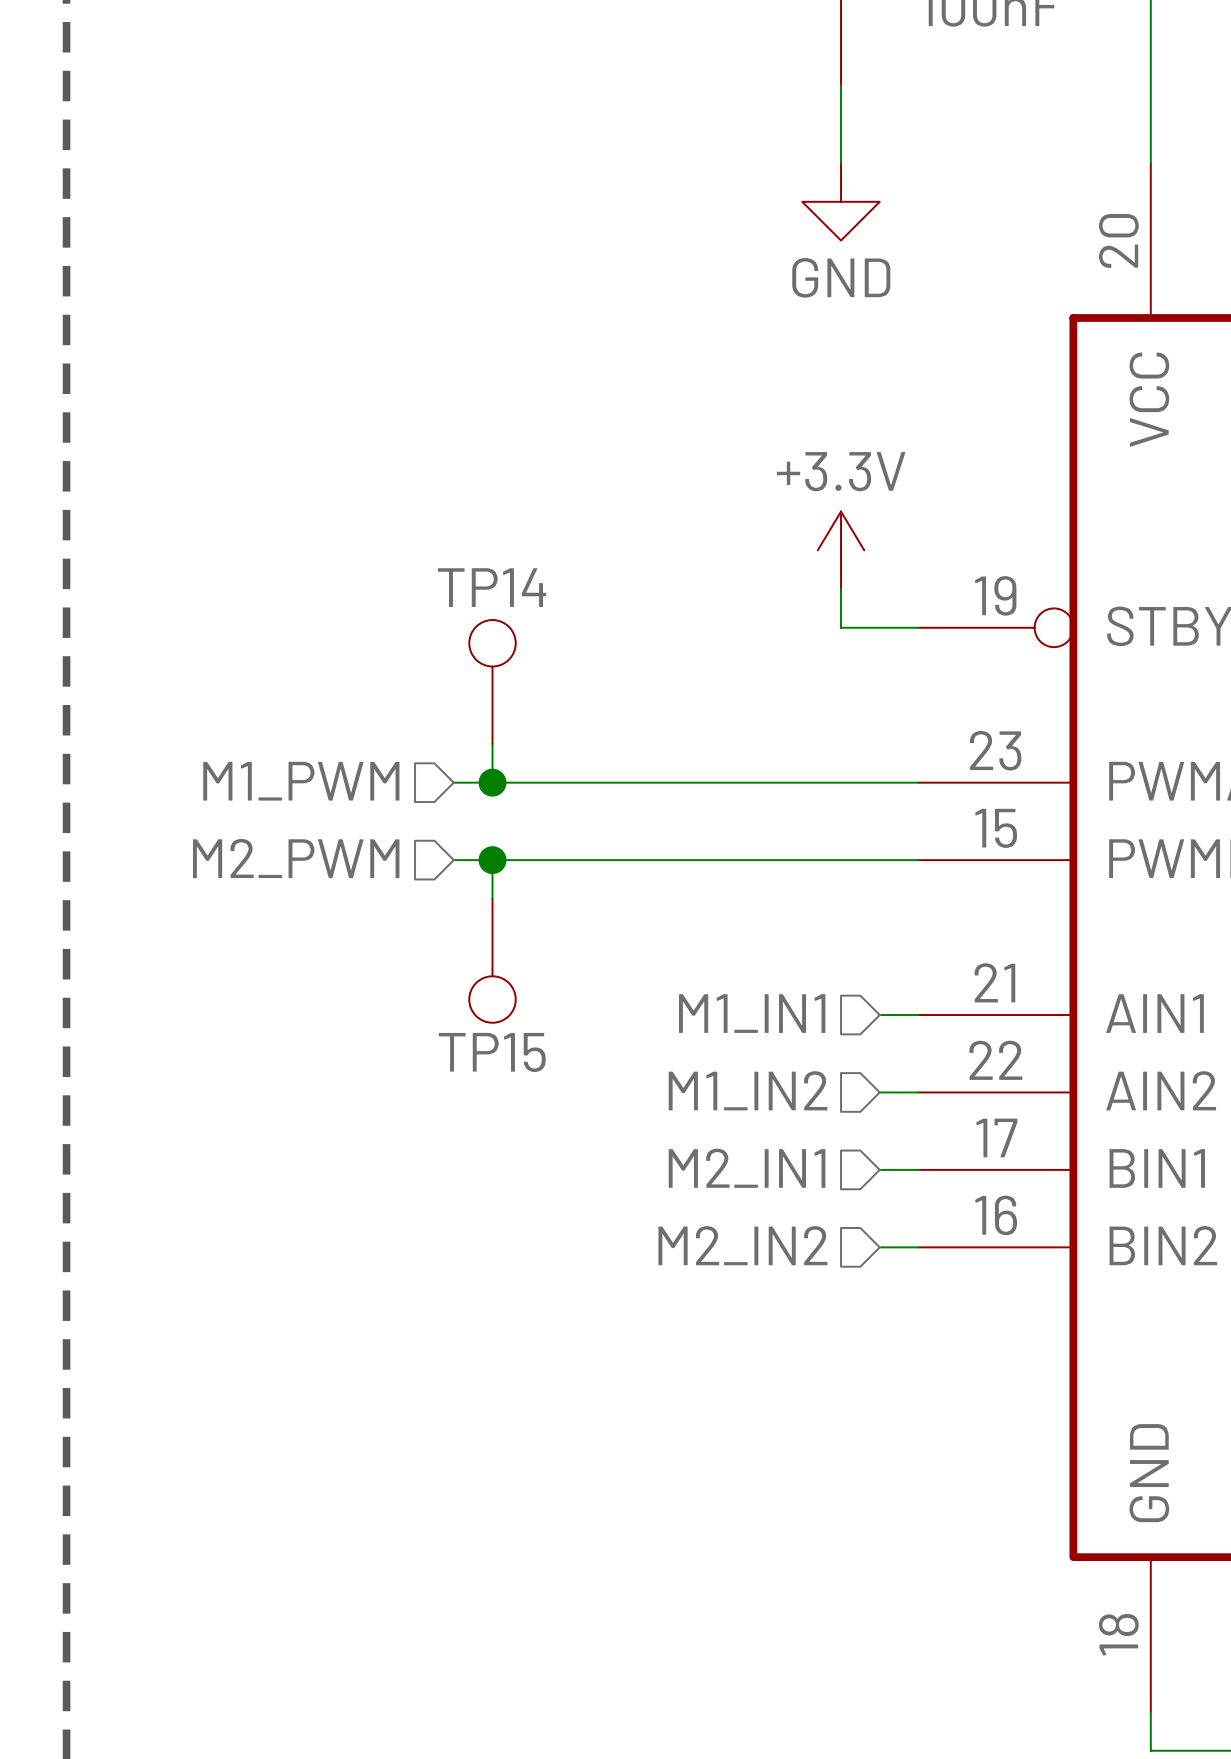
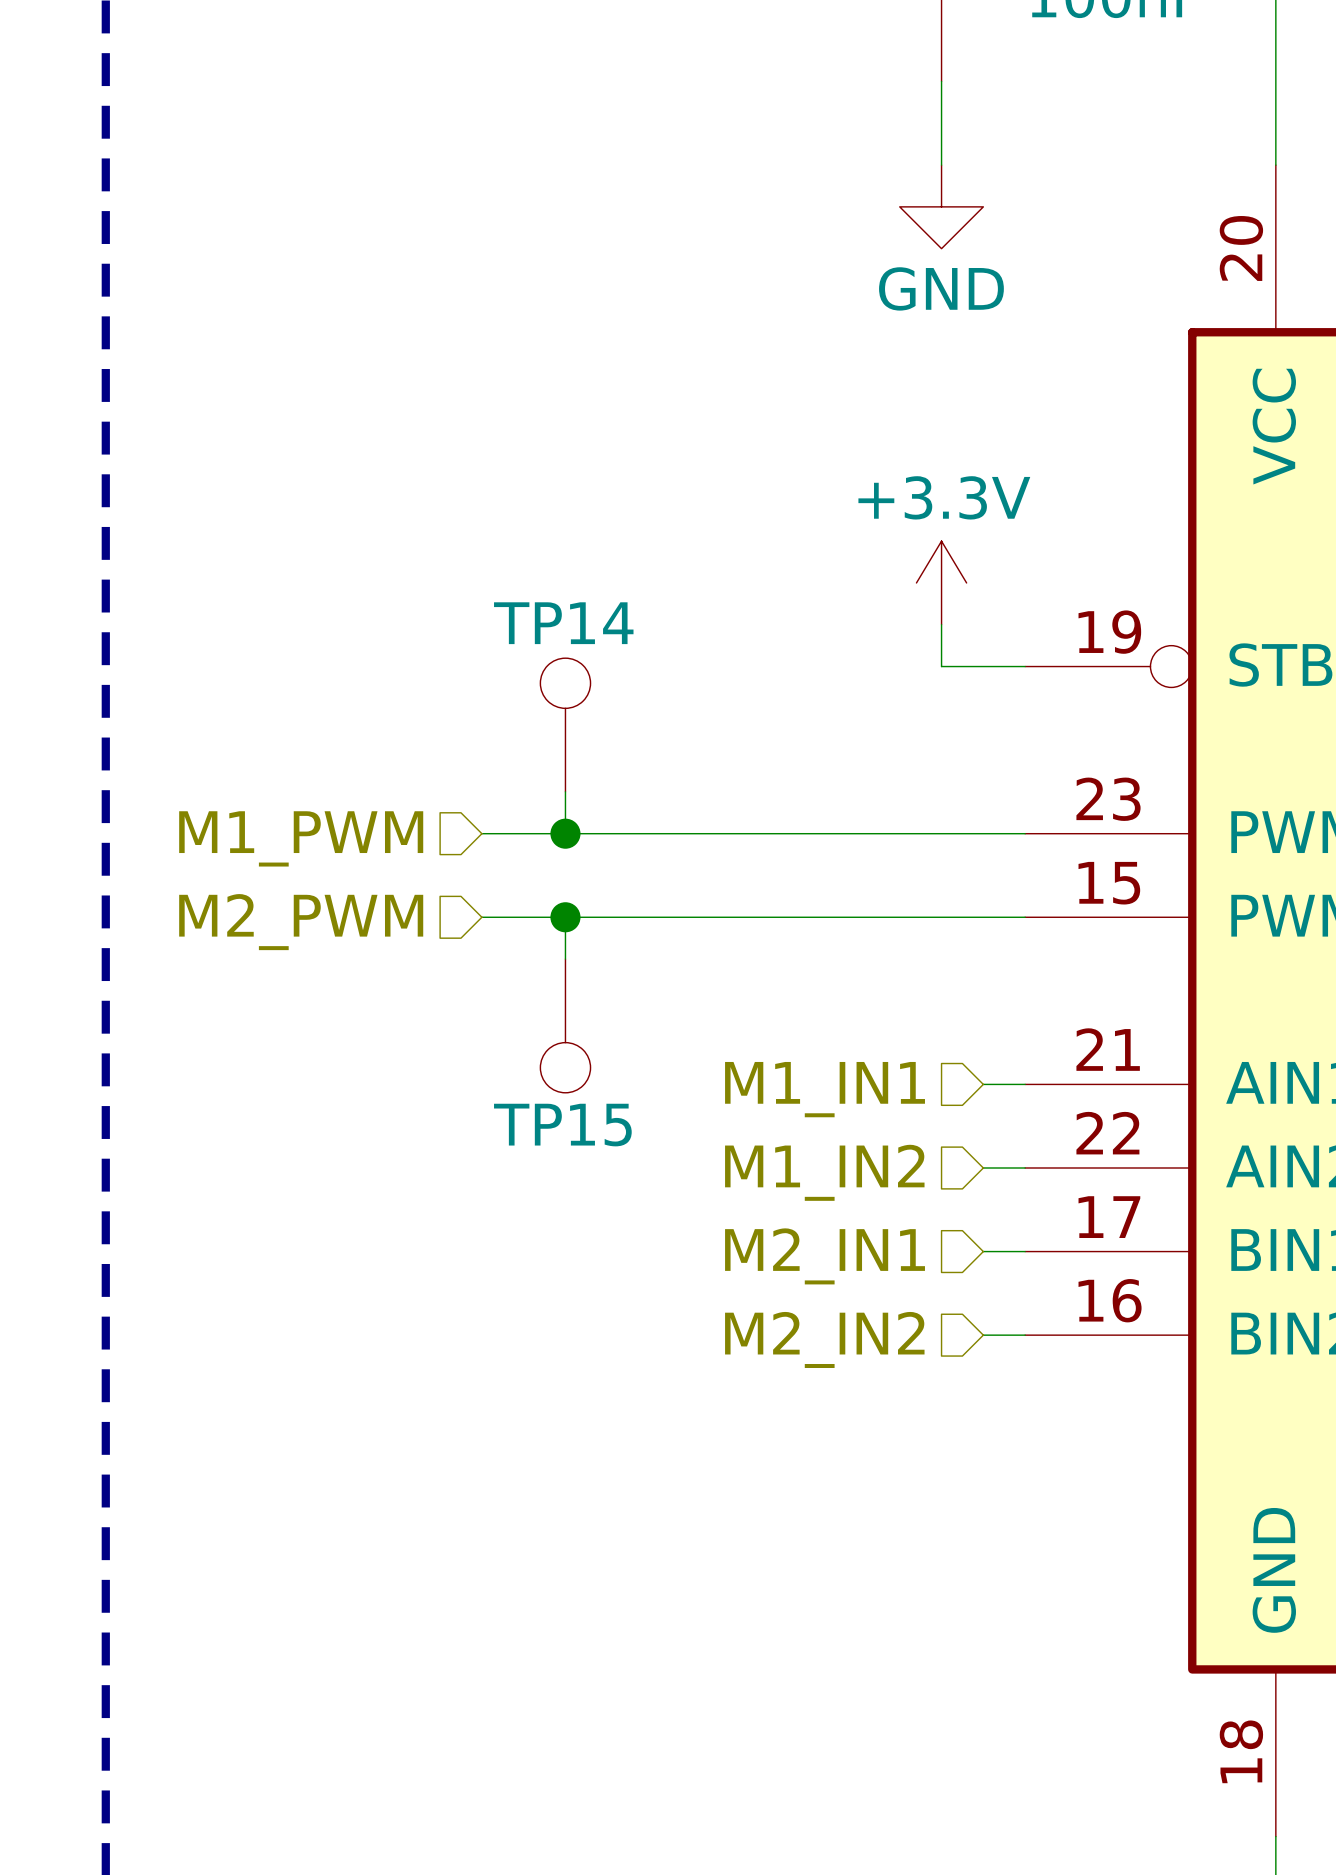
hierarchical label position: M1_PWM (301, 781) -> M1_PWM (301, 838)
wire: none -> (481, 833) (523, 833)
hierarchical label position: M2_PWM (296, 858) -> M2_PWM (301, 922)
wire: none -> (481, 917) (523, 917)

